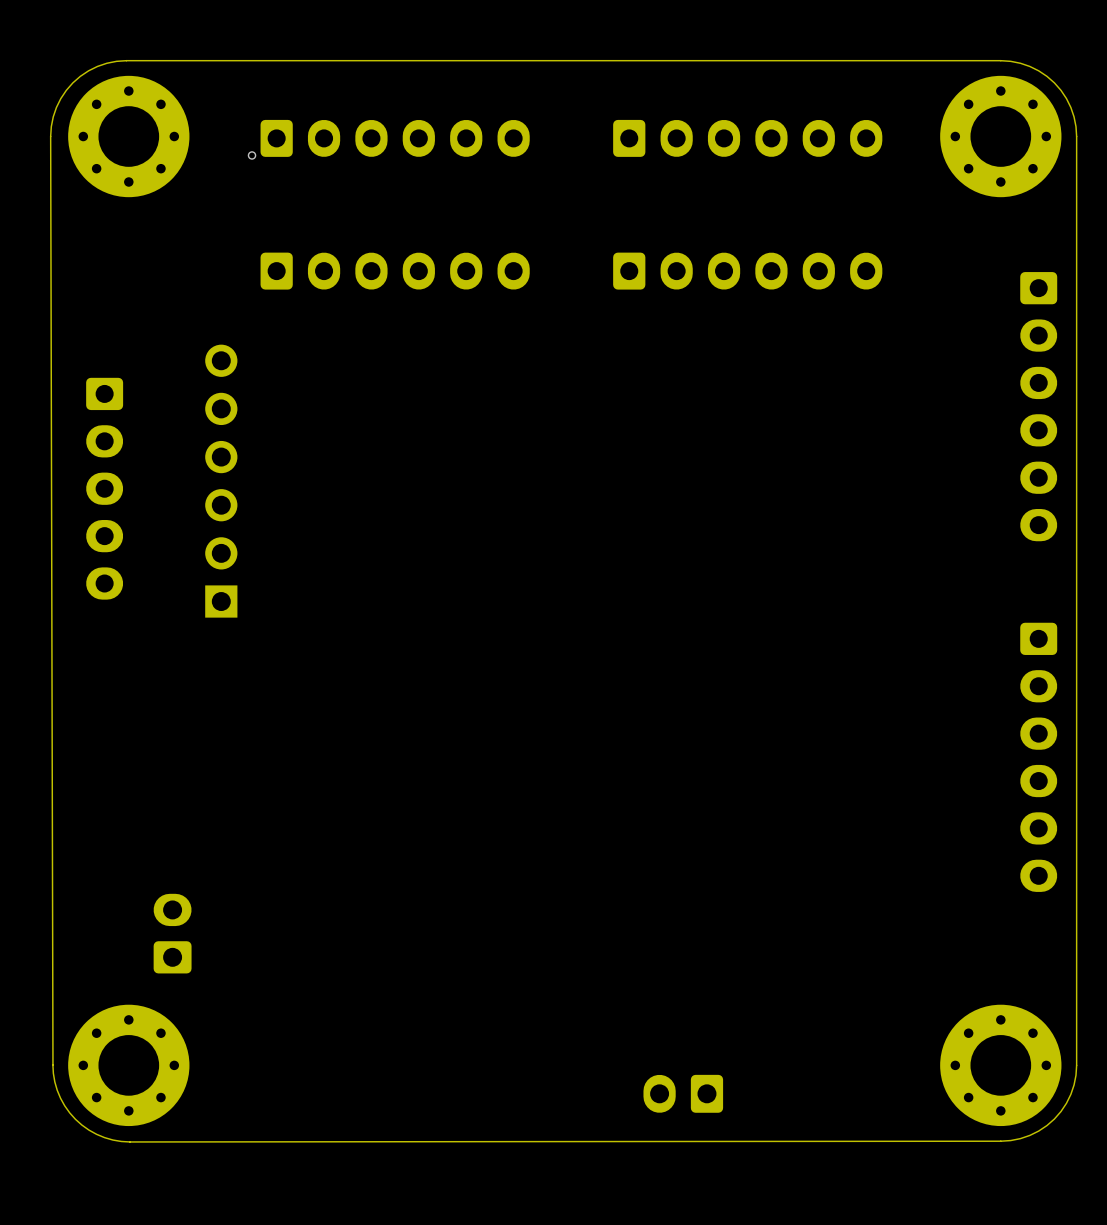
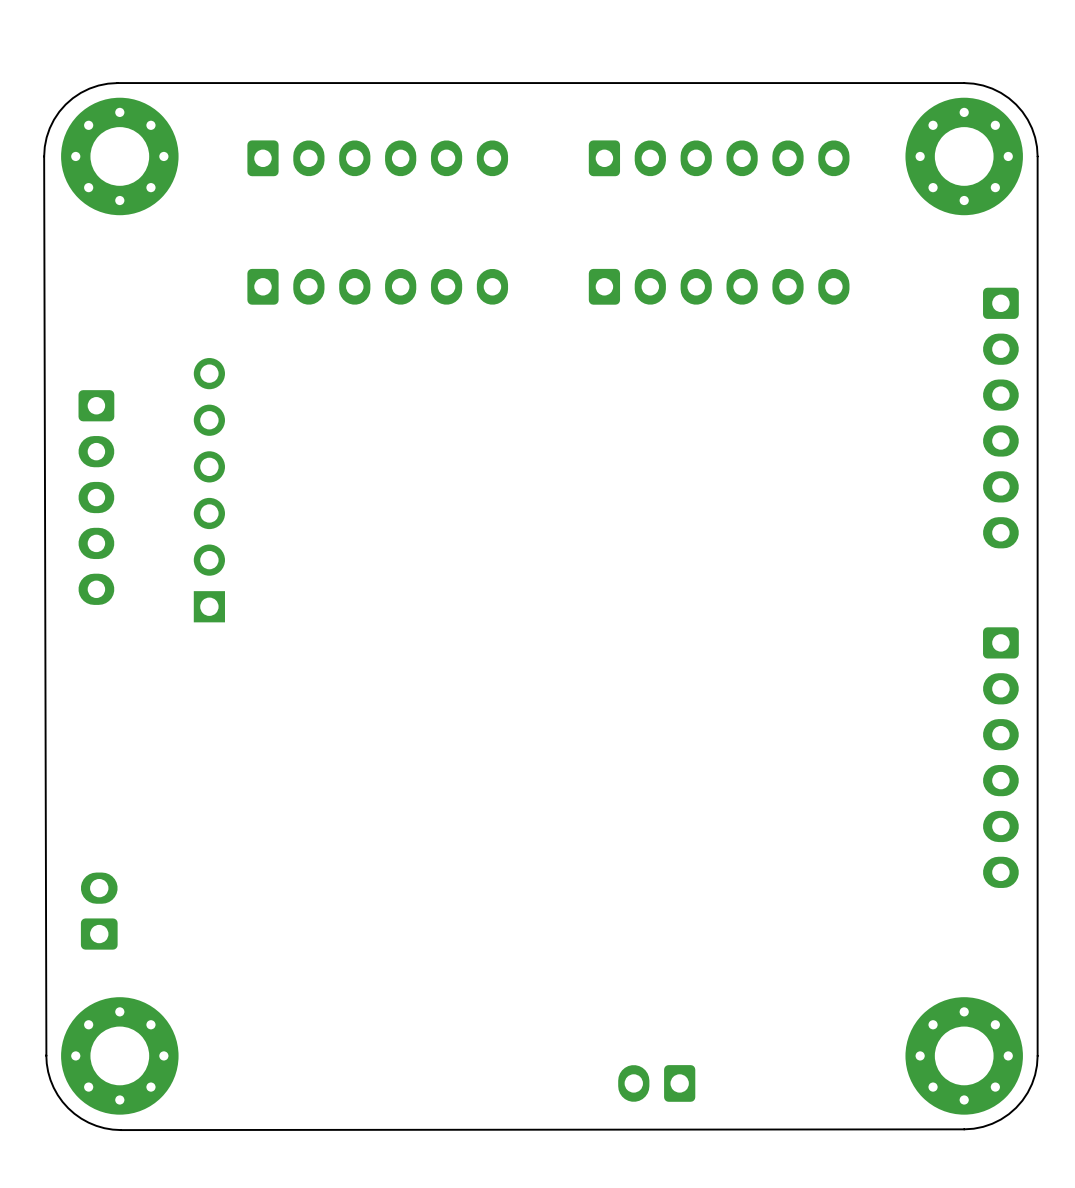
via: (252, 155) -> none
part position: (172, 933) -> (99, 911)

